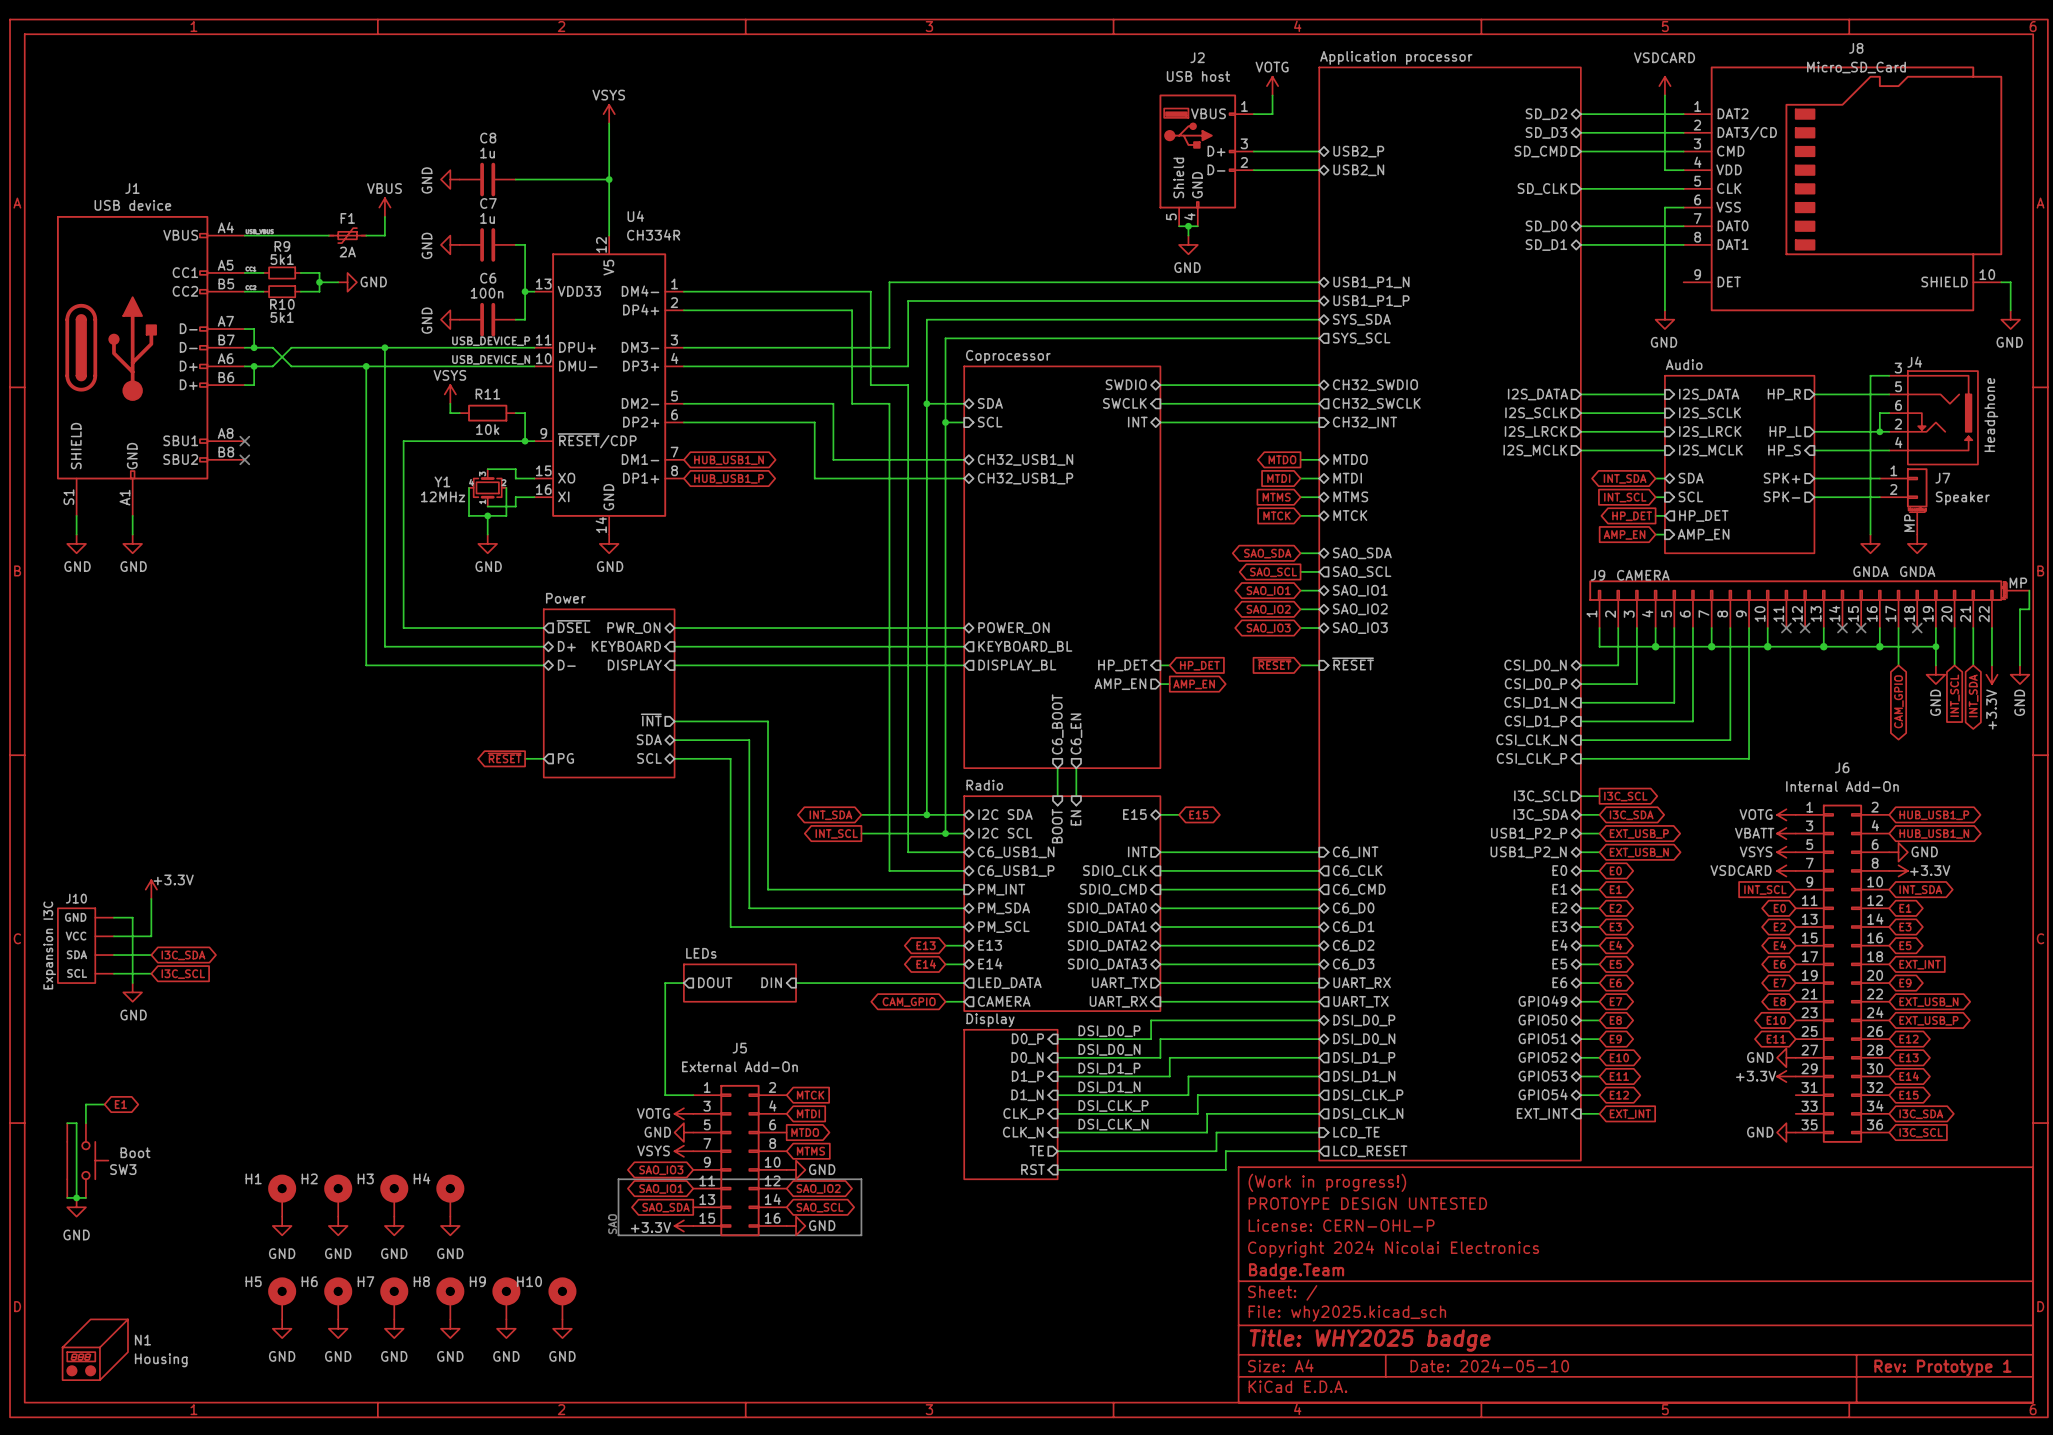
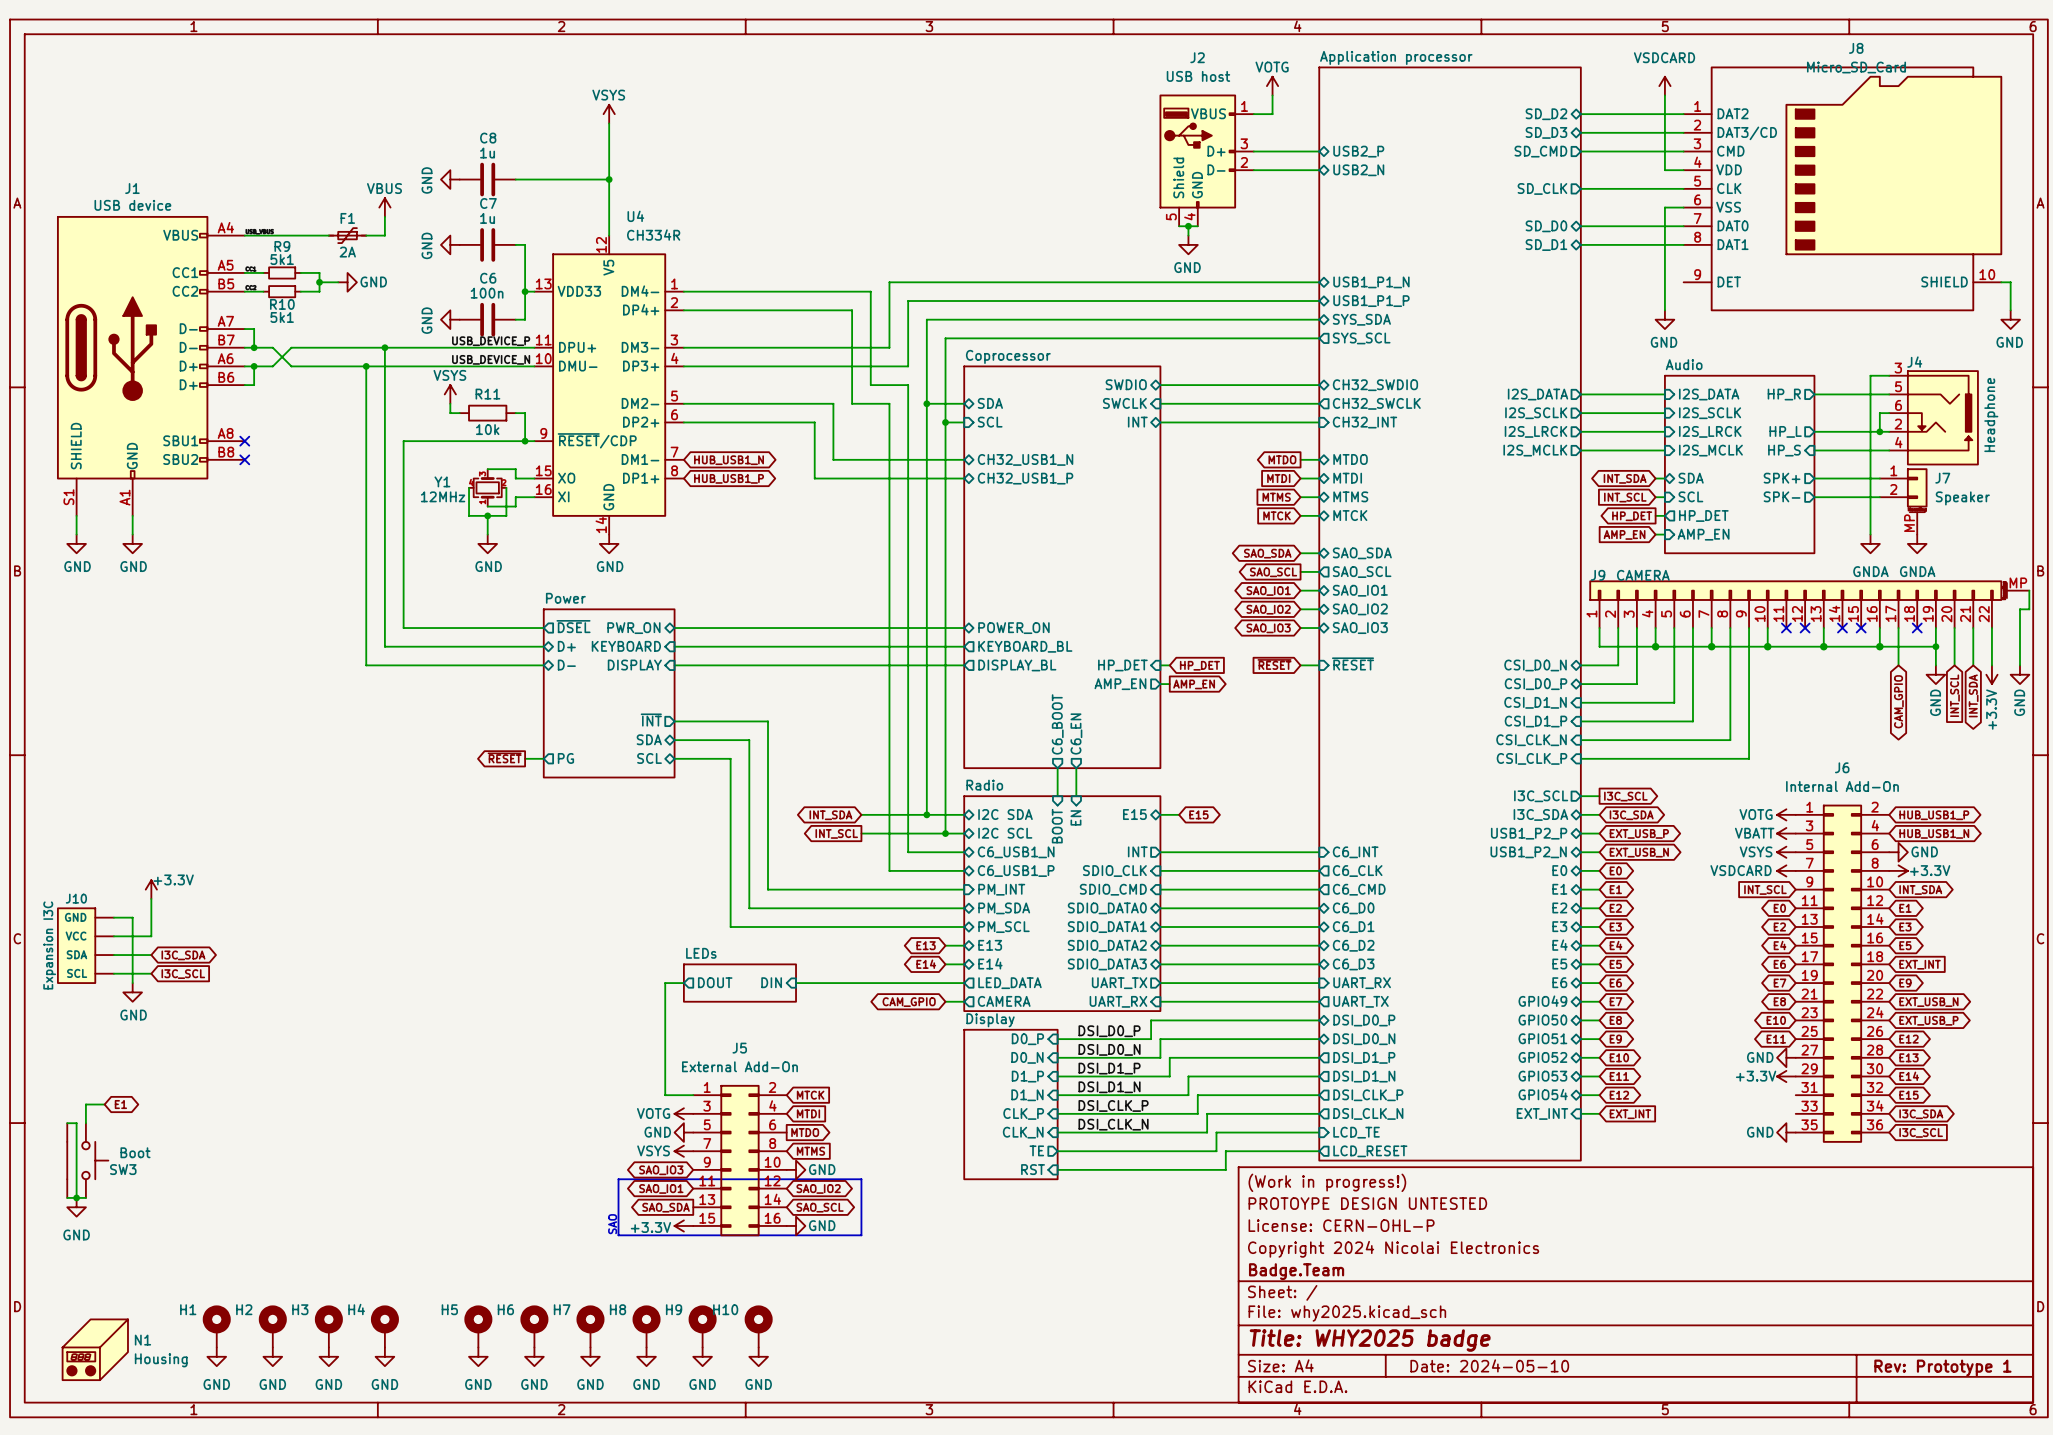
H1 position: (282, 1195) -> (216, 1326)
H2 position: (338, 1195) -> (272, 1326)
H3 position: (394, 1195) -> (328, 1326)
H4 position: (450, 1195) -> (384, 1326)
power symbol: GND (282, 1225) -> none
power symbol: GND (338, 1225) -> none
power symbol: GND (394, 1225) -> none
power symbol: GND (450, 1225) -> none
H5 position: (282, 1298) -> (478, 1326)
H6 position: (338, 1298) -> (534, 1326)
H7 position: (394, 1298) -> (590, 1326)
H8 position: (450, 1298) -> (646, 1326)
H9 position: (506, 1298) -> (702, 1326)
H10 position: (562, 1298) -> (758, 1326)
power symbol: GND (282, 1328) -> none
power symbol: GND (338, 1328) -> none
power symbol: GND (394, 1328) -> none
power symbol: GND (450, 1328) -> none
power symbol: GND (506, 1328) -> none
power symbol: GND (562, 1328) -> none
power symbol: none -> GND (216, 1356)
power symbol: none -> GND (272, 1356)
power symbol: none -> GND (328, 1356)
power symbol: none -> GND (384, 1356)
power symbol: none -> GND (478, 1356)
power symbol: none -> GND (534, 1356)
power symbol: none -> GND (590, 1356)
power symbol: none -> GND (646, 1356)
power symbol: none -> GND (702, 1356)
power symbol: none -> GND (758, 1356)

